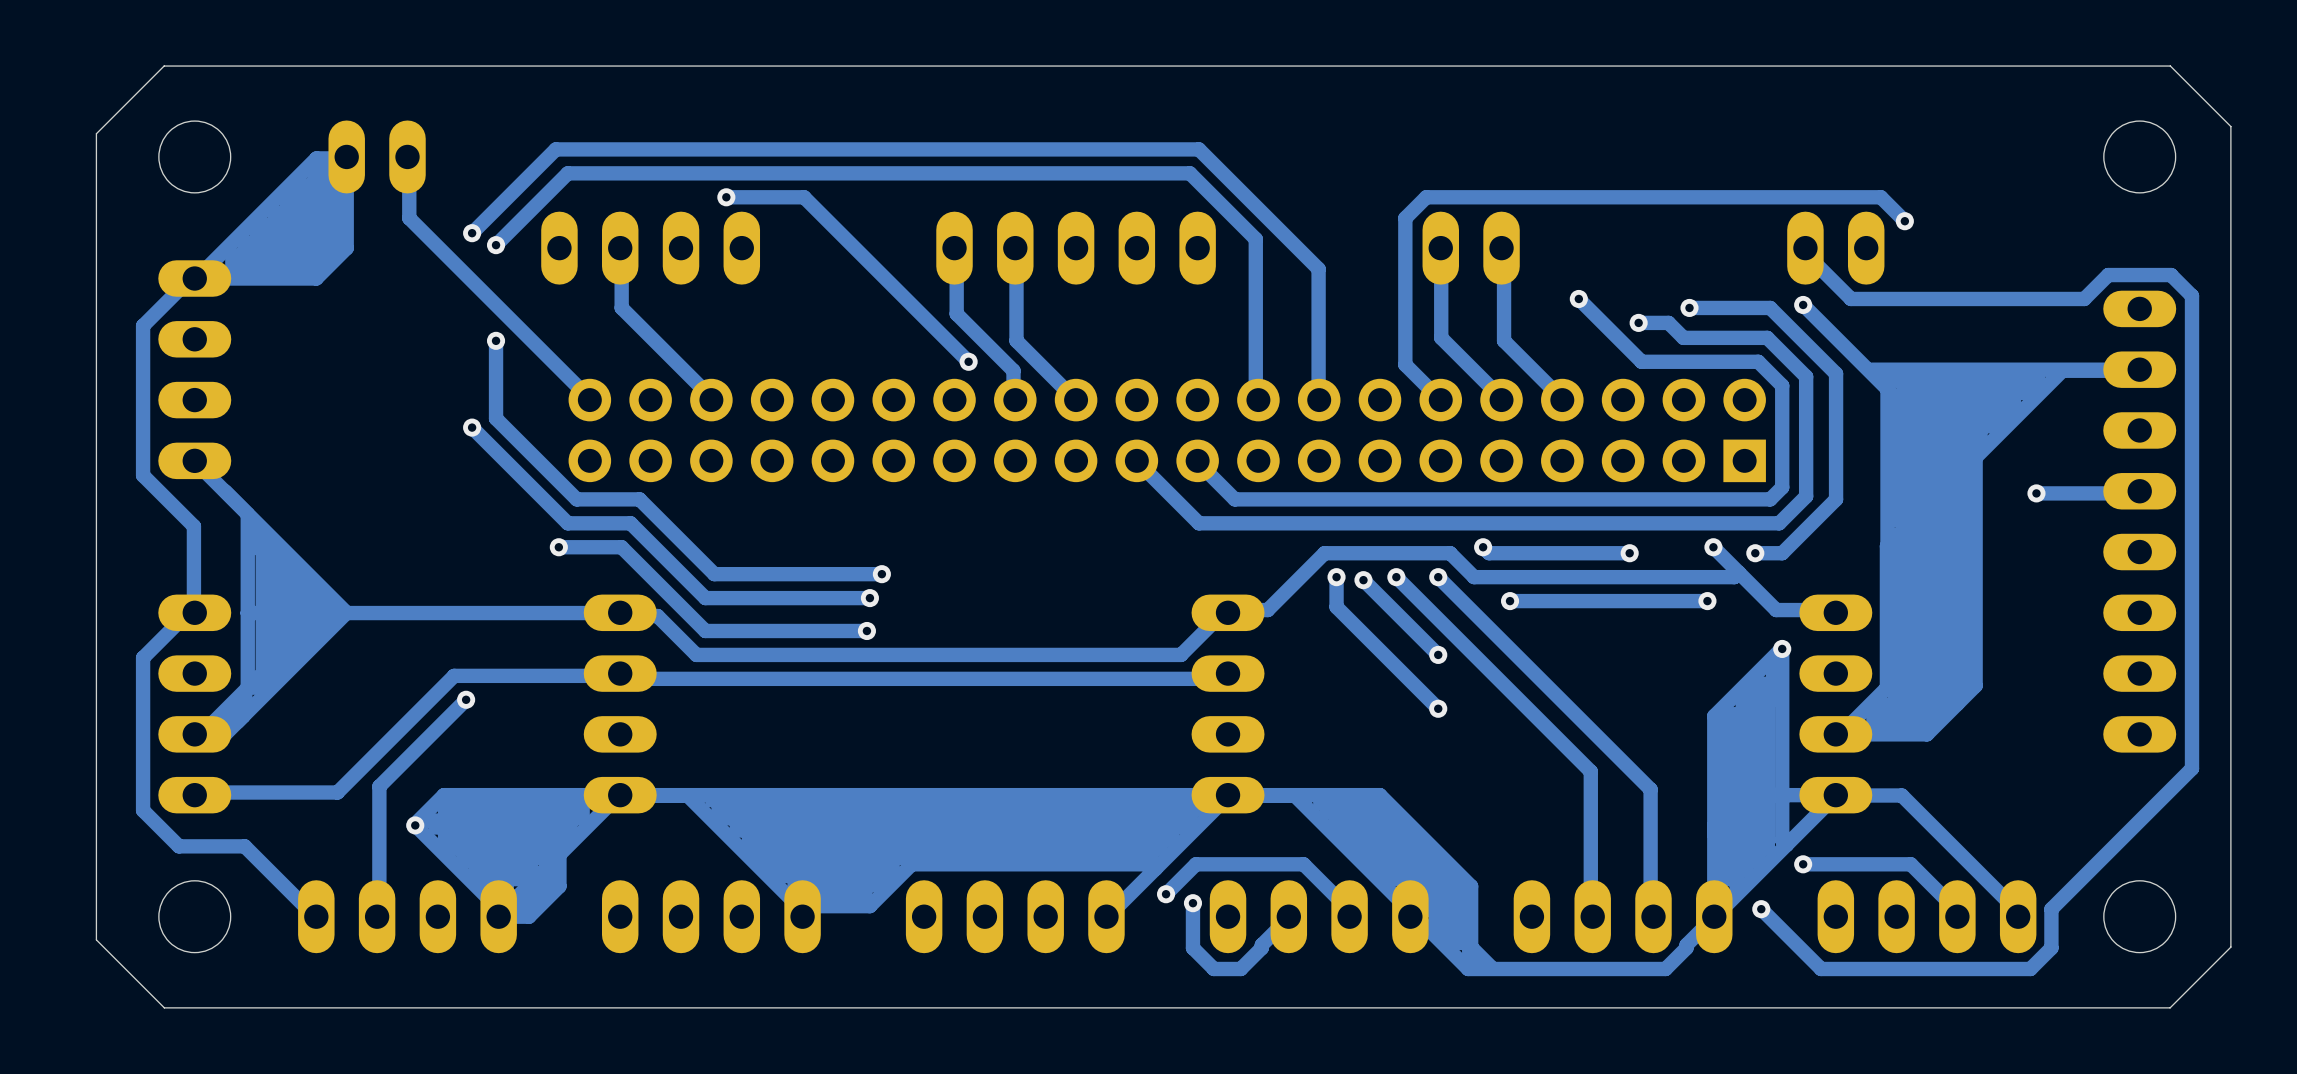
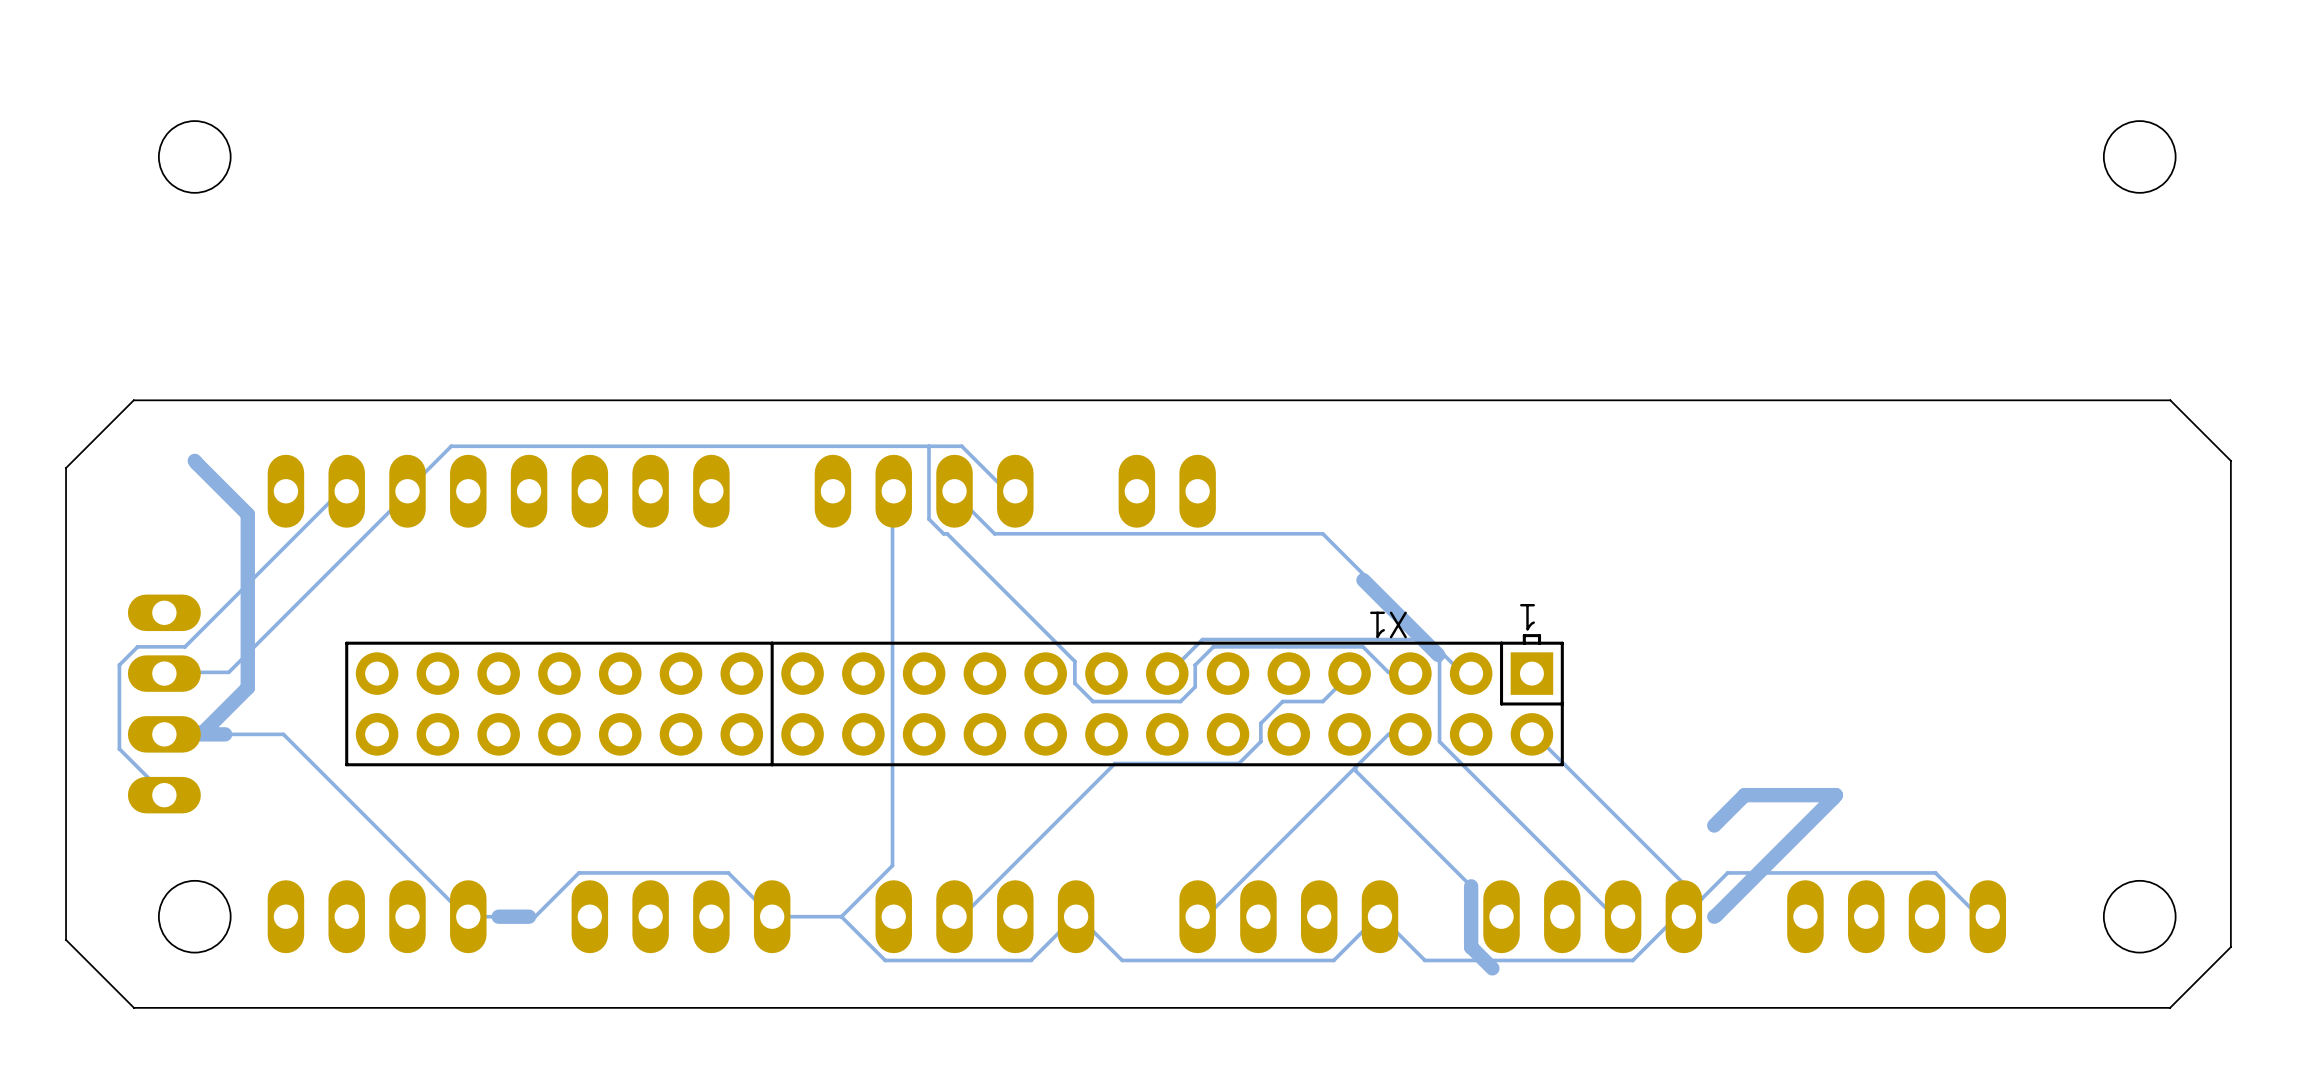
drawing: [225, 156, 347, 279] -> none
part: (377, 156) -> none
track: (407, 156) (409, 158) (409, 218) (589, 400) -> none
track: (726, 197) (804, 197) (968, 361) -> none
via: (726, 197) -> none
track: (1904, 221) (1880, 197) (1426, 197) (1405, 218) (1405, 364) (1440, 400) -> none
via: (1904, 221) -> none
track: (472, 233) (555, 149) (1198, 149) (1318, 269) (1319, 400) -> none
via: (472, 233) -> none
track: (496, 245) (567, 173) (1189, 173) (1255, 239) (1255, 397) (1258, 400) -> none
via: (496, 245) -> none
track: (620, 248) (621, 307) (711, 397) (711, 400) -> none
part: (650, 248) -> none
track: (954, 248) (956, 248) (956, 313) (1013, 370) (1013, 397) (1015, 400) -> none
track: (1015, 248) (1016, 340) (1076, 400) -> none
part: (1076, 248) -> none
track: (1441, 248) (1441, 337) (1501, 400) -> none
part: (1471, 248) -> none
track: (1501, 248) (1504, 248) (1504, 340) (1562, 400) -> none
track: (1805, 248) (1806, 254) (1851, 298) (2084, 298) (2108, 275) (2171, 275) (2192, 295) (2192, 768) (2051, 909) (2051, 948) (2030, 968) (1821, 968) (1761, 909) -> none
part: (1835, 248) -> none
track: (194, 278) (193, 281) (187, 281) (143, 325) (143, 475) (193, 526) (194, 612) (187, 613) (143, 657) (143, 810) (178, 846) (244, 846) (316, 916) -> none
track: (194, 278) (316, 158) (346, 156) (346, 248) (316, 278) (194, 278) -> none
track: (1578, 298) (1641, 361) (1758, 361) (1782, 385) (1782, 487) (1770, 499) (1234, 499) (1197, 460) -> none
via: (1578, 298) -> none
track: (1803, 304) (1965, 467) -> none
via: (1803, 304) -> none
track: (1689, 307) (1770, 307) (1836, 373) (1836, 499) (1782, 553) (1755, 553) -> none
via: (1689, 307) -> none
track: (1638, 322) (1668, 322) (1683, 337) (1767, 337) (1806, 376) (1806, 496) (1779, 523) (1198, 523) (1136, 460) -> none
via: (1638, 322) -> none
track: (496, 340) (496, 418) (576, 499) (639, 499) (714, 574) (881, 574) -> none
via: (496, 340) -> none
via: (968, 361) -> none
part: (194, 369) -> none
drawing: [1866, 369, 2046, 735] -> none
track: (1872, 369) (2139, 369) (2062, 370) (1886, 546) (1886, 687) (1842, 732) (1836, 732) (1835, 734) (1927, 734) (1975, 685) (1975, 451) -> none
track: (1887, 390) (1887, 548) -> none
track: (472, 427) (567, 523) (630, 523) (705, 598) (869, 598) -> none
via: (472, 427) -> none
X1 side: top (1167, 430) -> bottom (954, 700)
track: none -> (928, 446) (928, 519) (943, 533) (947, 533) (1074, 661) (1074, 683) (1093, 701) (1180, 701) (1195, 686) (1195, 665) (1213, 646) (1362, 646) (1388, 672) (1410, 673)
board edge: (2230, 460) (2230, 126) (2170, 66) (164, 66) (96, 133) (96, 939) (164, 1007) -> (2230, 460) (2170, 400) (133, 400) (66, 468) (66, 939) (133, 1007) (164, 1007)
track: (225, 491) (346, 612) (225, 734) -> (498, 916) (465, 916) (283, 734) (225, 734)
track: none -> (346, 491) (345, 493) (338, 493) (185, 646) (137, 646) (119, 665) (119, 748) (164, 795)
part: none -> (498, 491)
track: none -> (893, 491) (892, 865) (841, 916)
part: none -> (924, 491)
track: none -> (954, 491) (954, 493) (994, 533) (1322, 533) (1461, 672) (1471, 673)
track: none -> (1015, 491) (1005, 490) (961, 446) (451, 446) (407, 490) (407, 493) (228, 672) (164, 673)
part: none -> (1167, 491)
track: (2139, 491) (2138, 493) (2036, 493) -> none
via: (2036, 493) -> none
part: (2139, 521) -> none
drawing: [219, 527, 335, 729] -> none
track: (558, 547) (621, 547) (705, 630) (866, 630) -> none
via: (558, 547) -> none
track: (1483, 547) (1489, 553) (1629, 553) -> none
via: (1483, 547) -> none
track: (1713, 547) (1776, 610) (1833, 610) (1835, 612) -> none
via: (1713, 547) -> none
via: (1629, 553) -> none
via: (1755, 553) -> none
track: (1738, 572) (1734, 577) (1474, 577) (1450, 553) (1324, 553) (1267, 610) (1228, 610) (1228, 612) (1222, 613) (1181, 654) (696, 654) (657, 616) (624, 616) (620, 612) (247, 613) -> none
via: (881, 574) -> none
track: (1336, 577) (1336, 607) (1438, 708) -> none
via: (1336, 577) -> none
track: (1396, 577) (1590, 771) (1590, 915) (1592, 916) -> none
via: (1396, 577) -> none
track: (1438, 577) (1650, 789) (1650, 915) (1653, 916) -> none
via: (1438, 577) -> none
via: (1363, 580) -> none
via: (869, 598) -> none
via: (1510, 601) -> none
track: (1707, 601) (1510, 601) -> none
via: (1707, 601) -> none
via: (866, 630) -> none
track: (1782, 648) (1782, 840) (1786, 844) -> none
via: (1782, 648) -> none
track: (1781, 649) (1714, 716) (1714, 916) (1665, 968) (1468, 968) (1417, 918) (1408, 915) (1408, 909) (1294, 795) (1228, 795) (1106, 916) -> none
via: (1438, 654) -> none
drawing: [1714, 664, 1779, 893] -> none
track: none -> (1167, 673) (1202, 639) (1417, 639) (1439, 661) (1439, 741) (1614, 916) (1623, 916)
track: (1228, 673) (1222, 678) (624, 678) (620, 673) (618, 675) (454, 675) (337, 792) (196, 792) (194, 795) -> none
track: none -> (1349, 673) (1322, 701) (1282, 701) (1260, 723) (1260, 741) (1238, 763) (1114, 763) (961, 916) (954, 916)
track: (466, 699) (379, 786) (379, 915) (377, 916) -> none
via: (466, 699) -> none
part position: (194, 703) -> (164, 703)
part: (620, 703) -> none
part: (1228, 703) -> none
part: (1835, 703) -> none
via: (1438, 708) -> none
track: none -> (1410, 734) (1388, 734) (1206, 916) (1197, 916)
track: none -> (1531, 734) (1534, 734) (1698, 898) (1702, 898)
drawing: [422, 795, 590, 911] -> none
drawing: [705, 795, 1210, 905] -> none
drawing: [1313, 795, 1478, 966] -> none
track: (1379, 795) (443, 795) (413, 825) -> (1379, 795) (1355, 770) (1355, 767)
track width: thick (1379, 795) (1471, 886) -> thin (1379, 795) (1471, 886)
track: (1836, 795) (1901, 795) (2015, 909) (2015, 915) (2018, 916) -> none
track: (415, 825) (499, 909) (498, 916) (620, 795) (687, 795) (801, 909) (802, 916) (807, 906) (869, 906) (911, 864) (1151, 864) (1155, 868) -> none
via: (415, 825) -> none
track: (559, 846) (559, 886) (529, 916) -> (841, 916) (772, 916) (728, 872) (578, 872) (535, 916) (529, 916)
track: (1803, 864) (1910, 864) (1955, 909) (1957, 916) -> none
via: (1803, 864) -> none
track: (1166, 894) (1195, 864) (1303, 864) (1348, 909) (1349, 916) -> none
via: (1166, 894) -> none
track: (1192, 903) (1192, 948) (1213, 968) (1240, 968) (1288, 916) -> none
via: (1192, 903) -> none
via: (1761, 909) -> none
part position: (407, 916) -> (377, 916)
part position: (711, 916) -> (681, 916)
part position: (1015, 916) -> (984, 916)
part position: (1319, 916) -> (1288, 916)
part position: (1623, 916) -> (1592, 916)
part position: (1927, 916) -> (1896, 916)
track: none -> (1987, 916) (1979, 916) (1935, 872) (1727, 872) (1683, 916) (1676, 916) (1632, 960) (1424, 960) (1381, 916) (1377, 916) (1333, 960) (1122, 960) (1078, 916) (1074, 916) (1031, 960) (885, 960) (841, 916)

